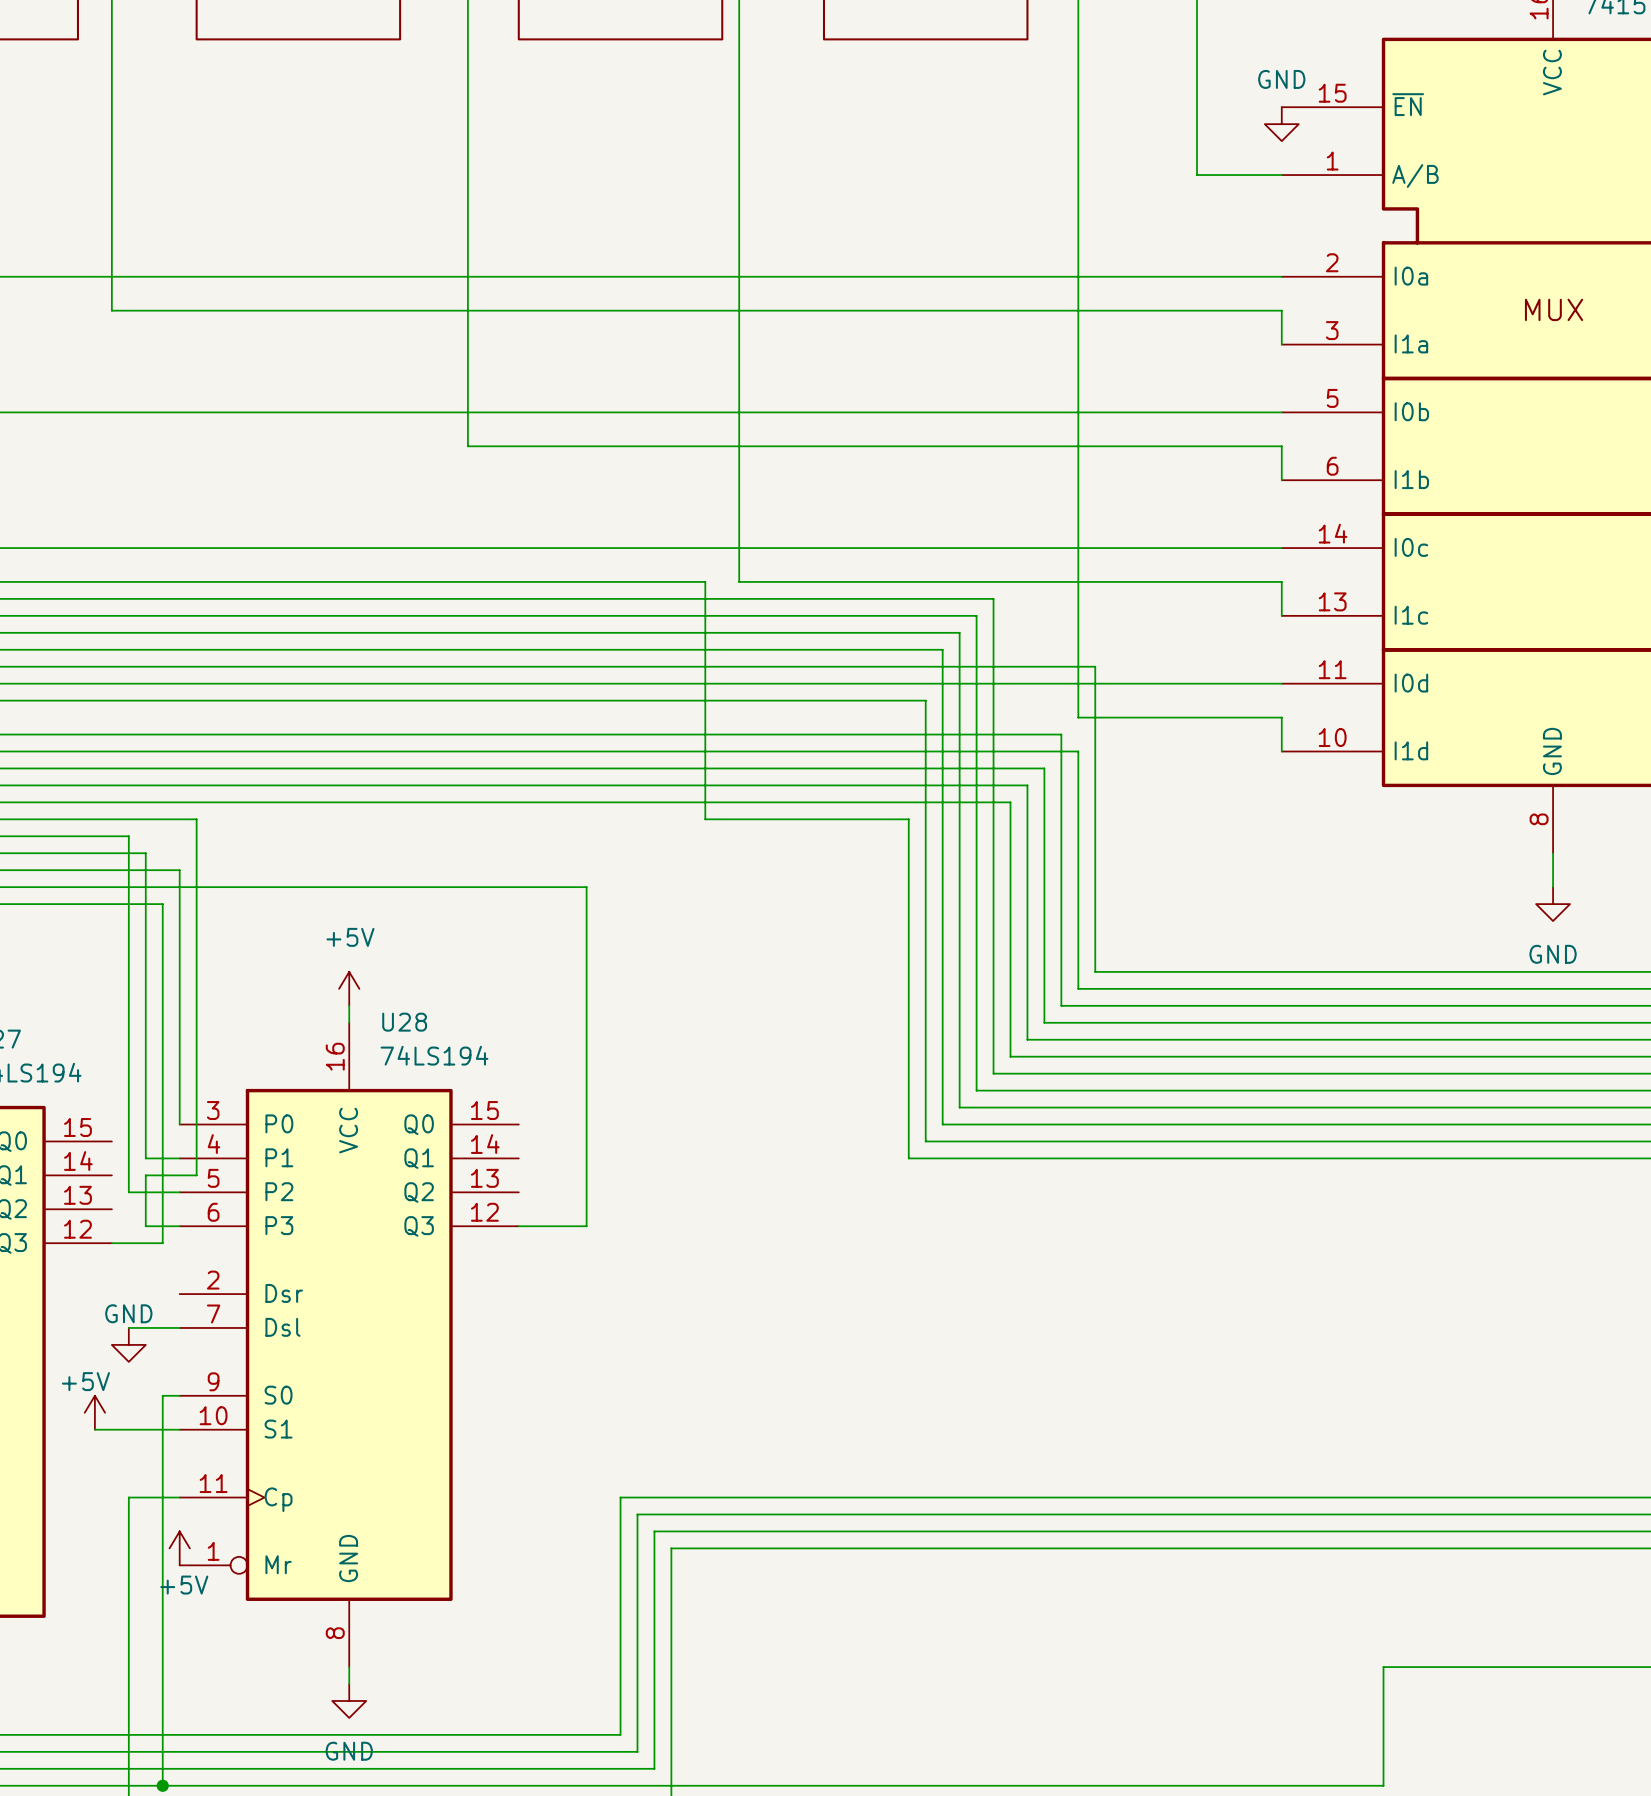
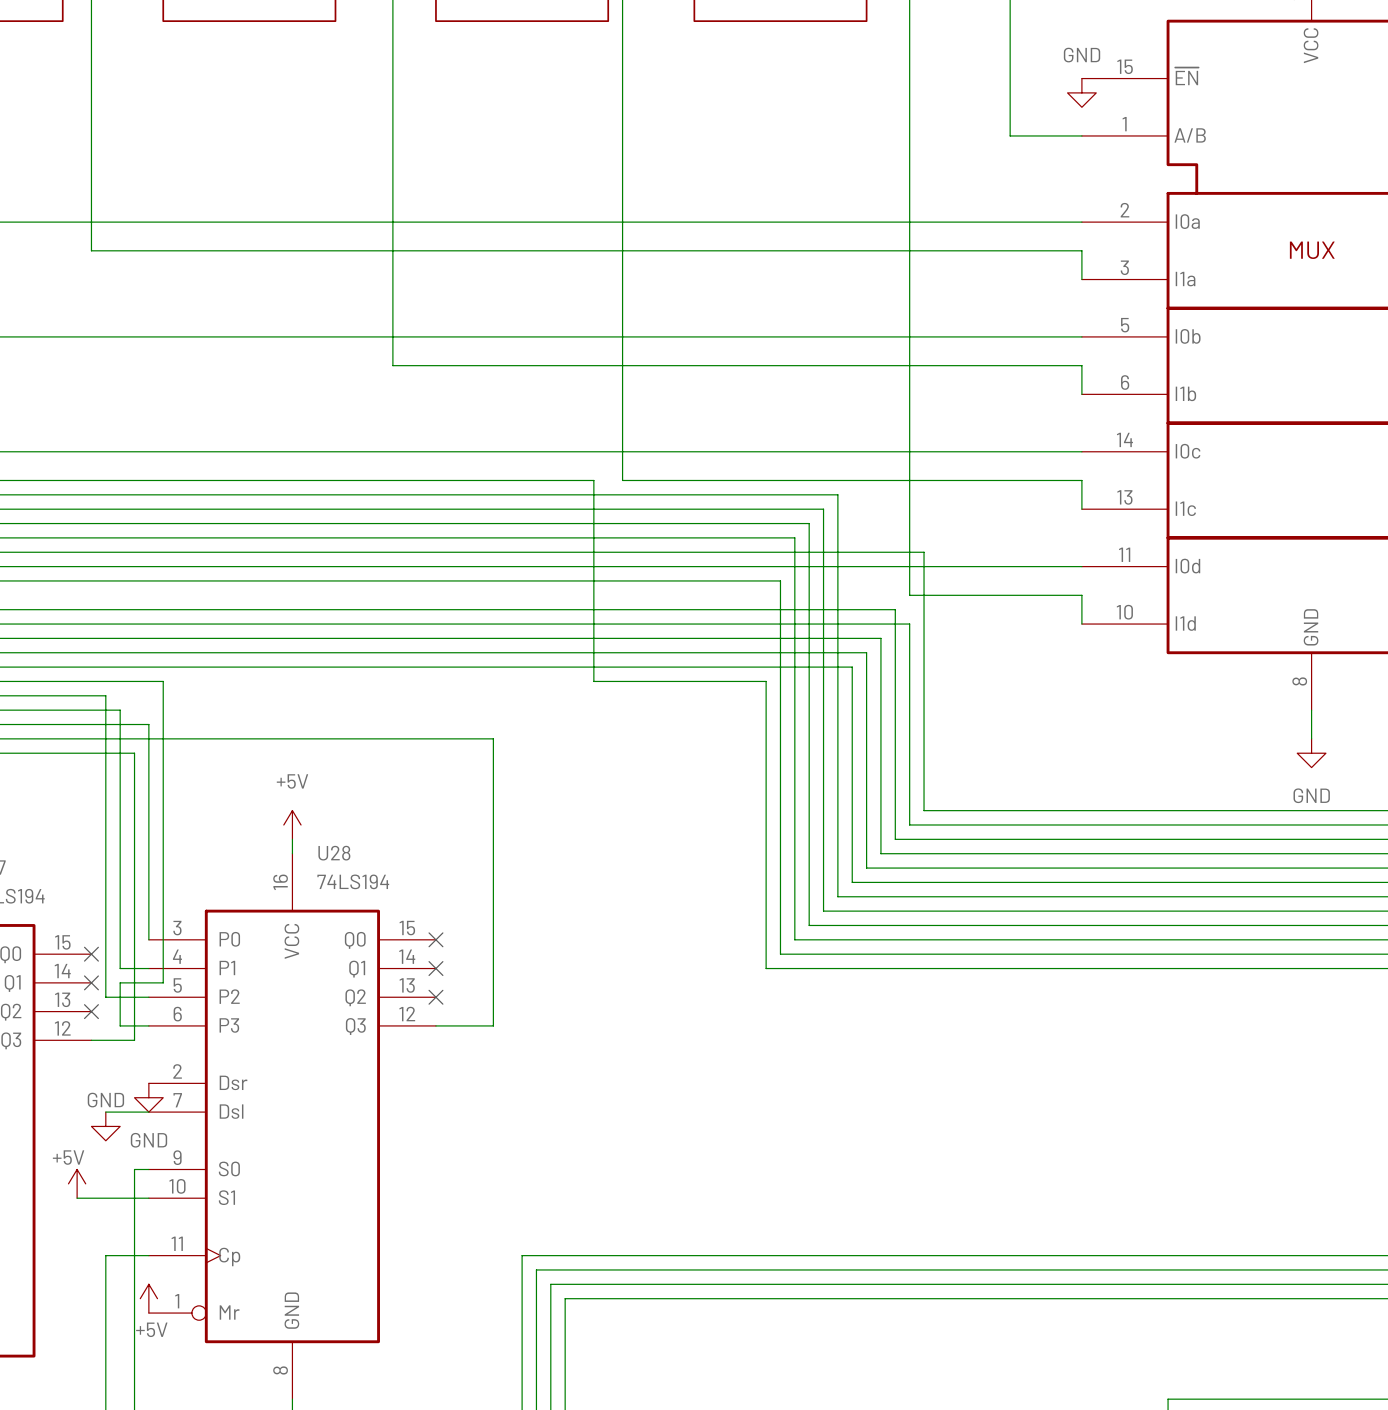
no-connect mark: none -> (435, 939)
no-connect mark: none -> (91, 954)
no-connect mark: none -> (435, 968)
no-connect mark: none -> (91, 982)
no-connect mark: none -> (435, 997)
no-connect mark: none -> (91, 1011)
power symbol: none -> GND (148, 1097)

